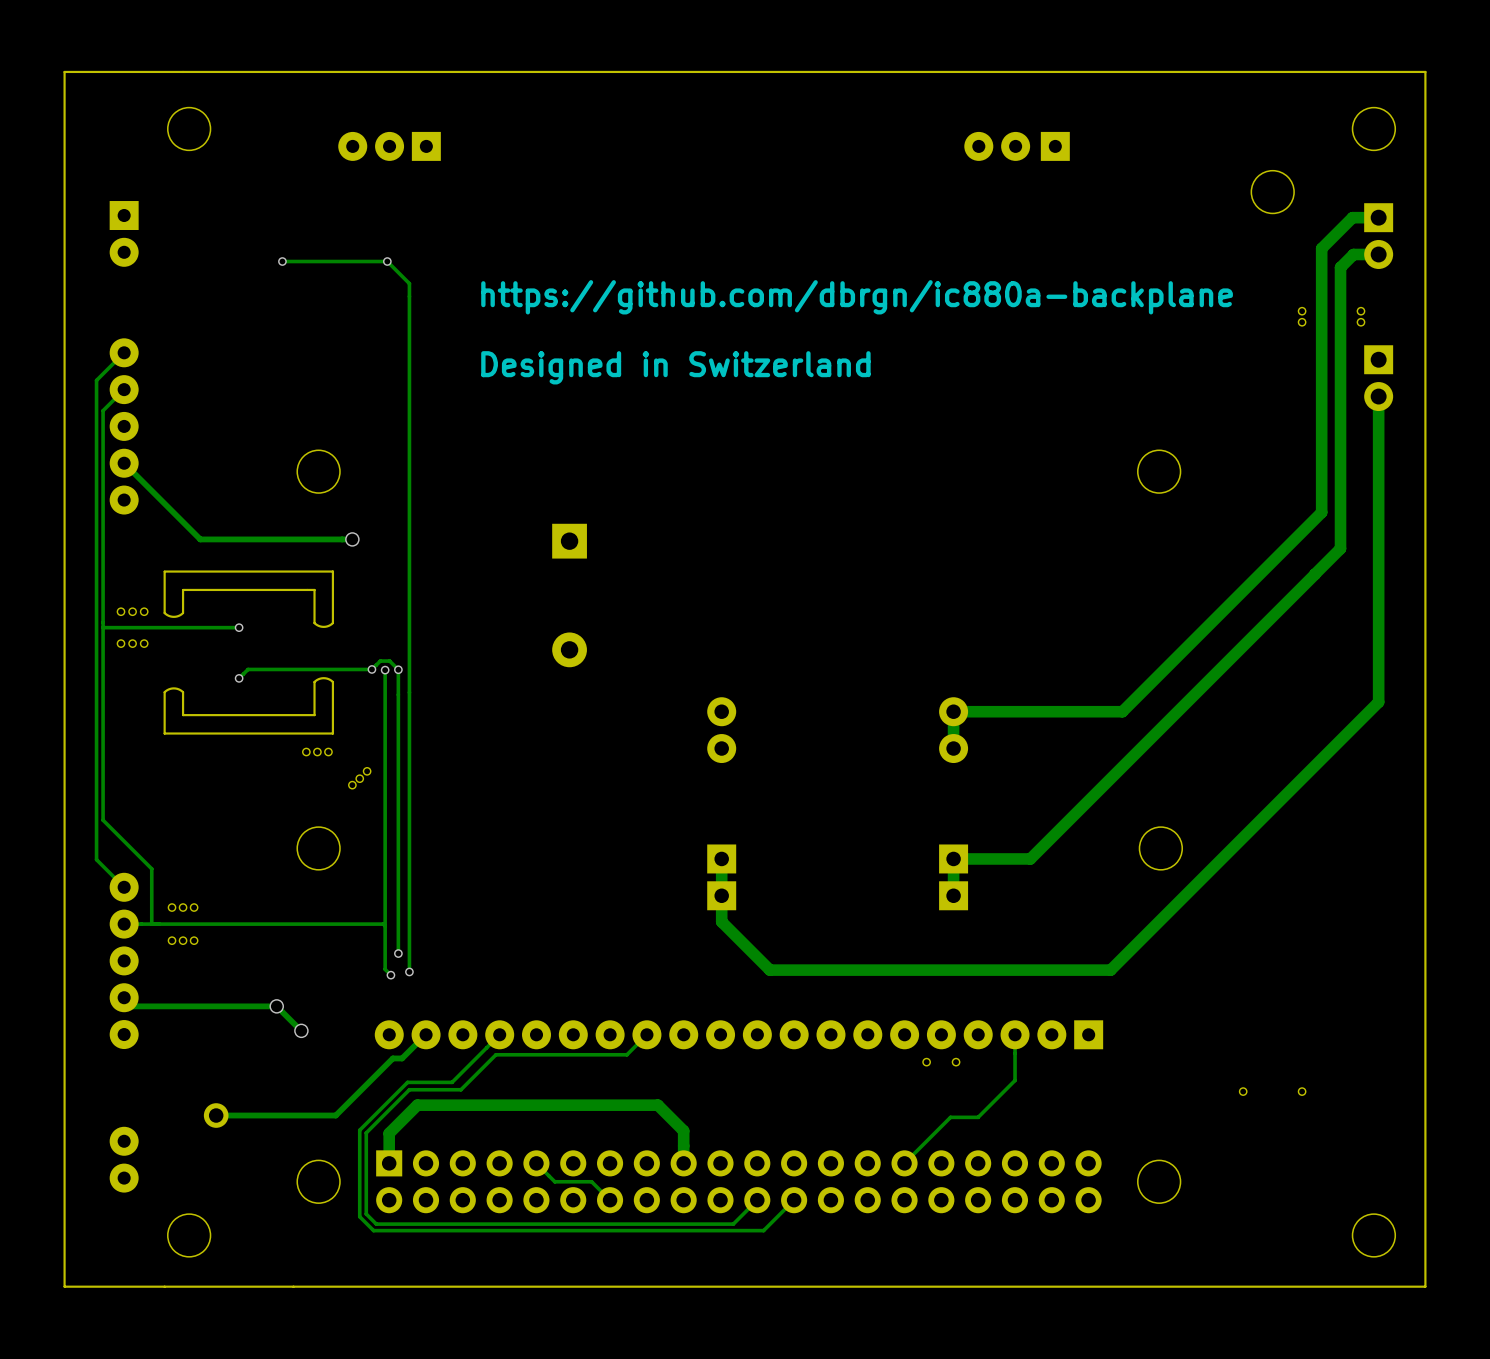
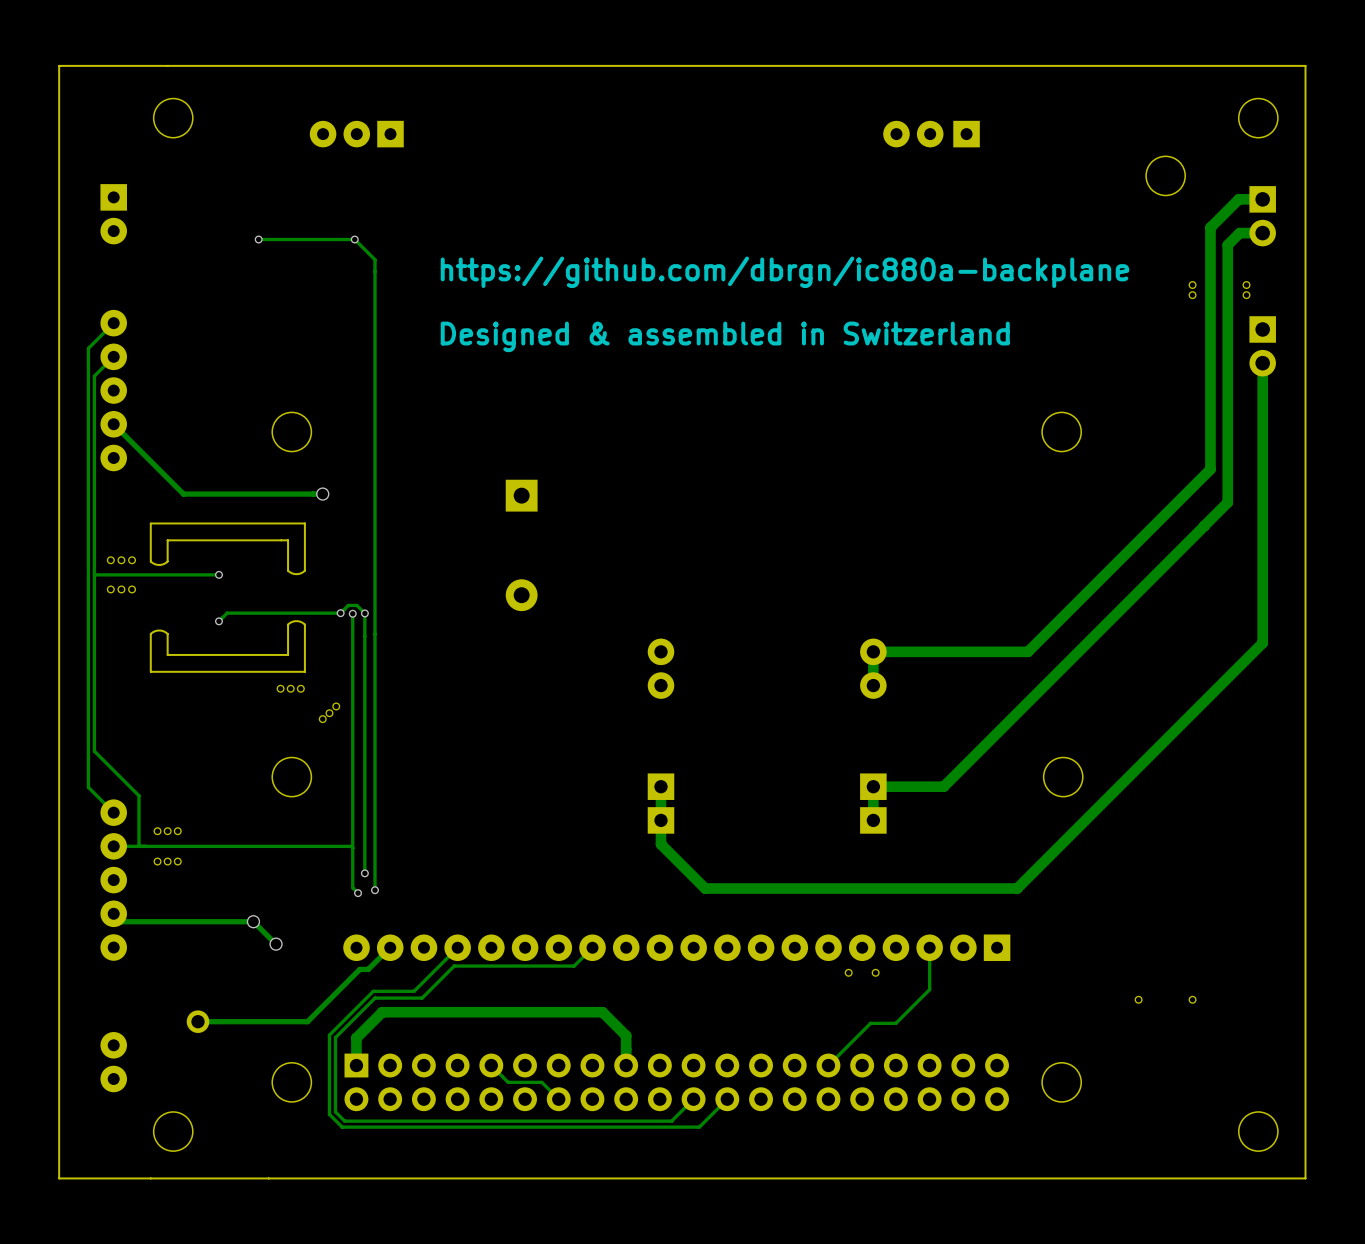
text: Designed in Switzerland (675, 367) -> Designed & assembled in Switzerland (725, 336)

